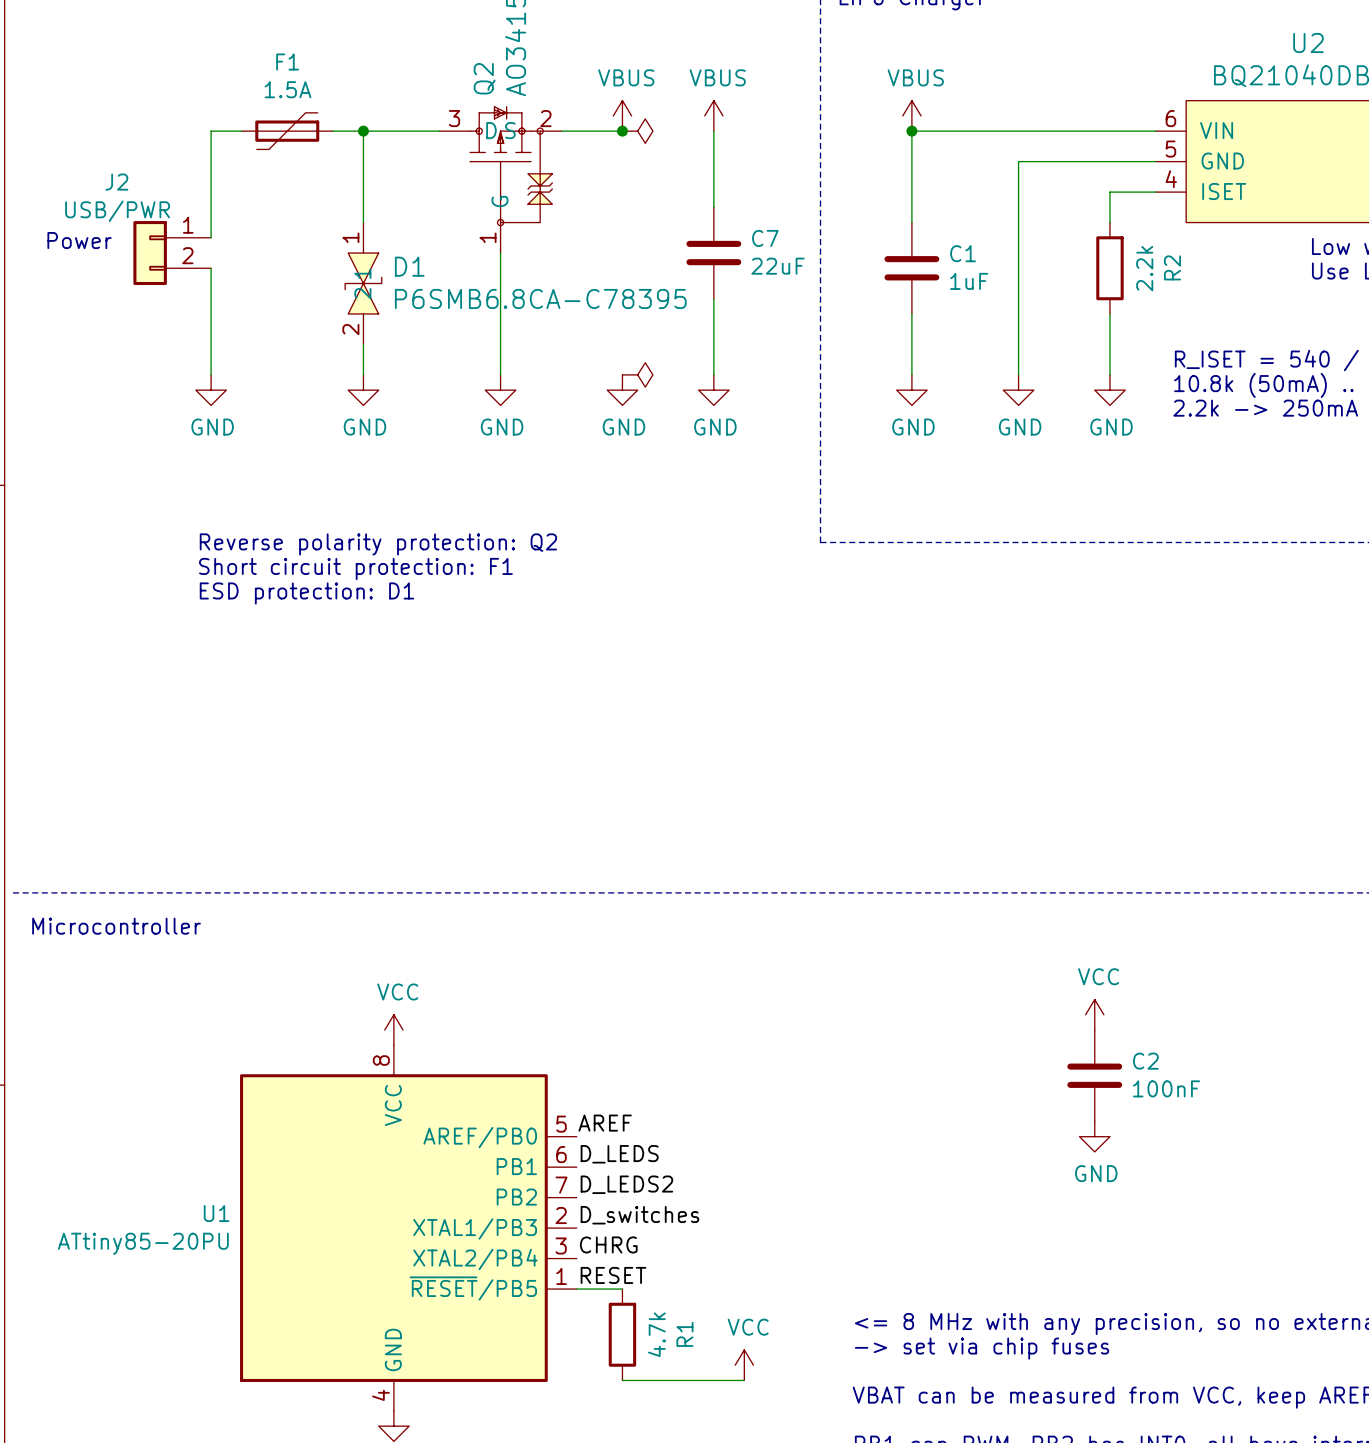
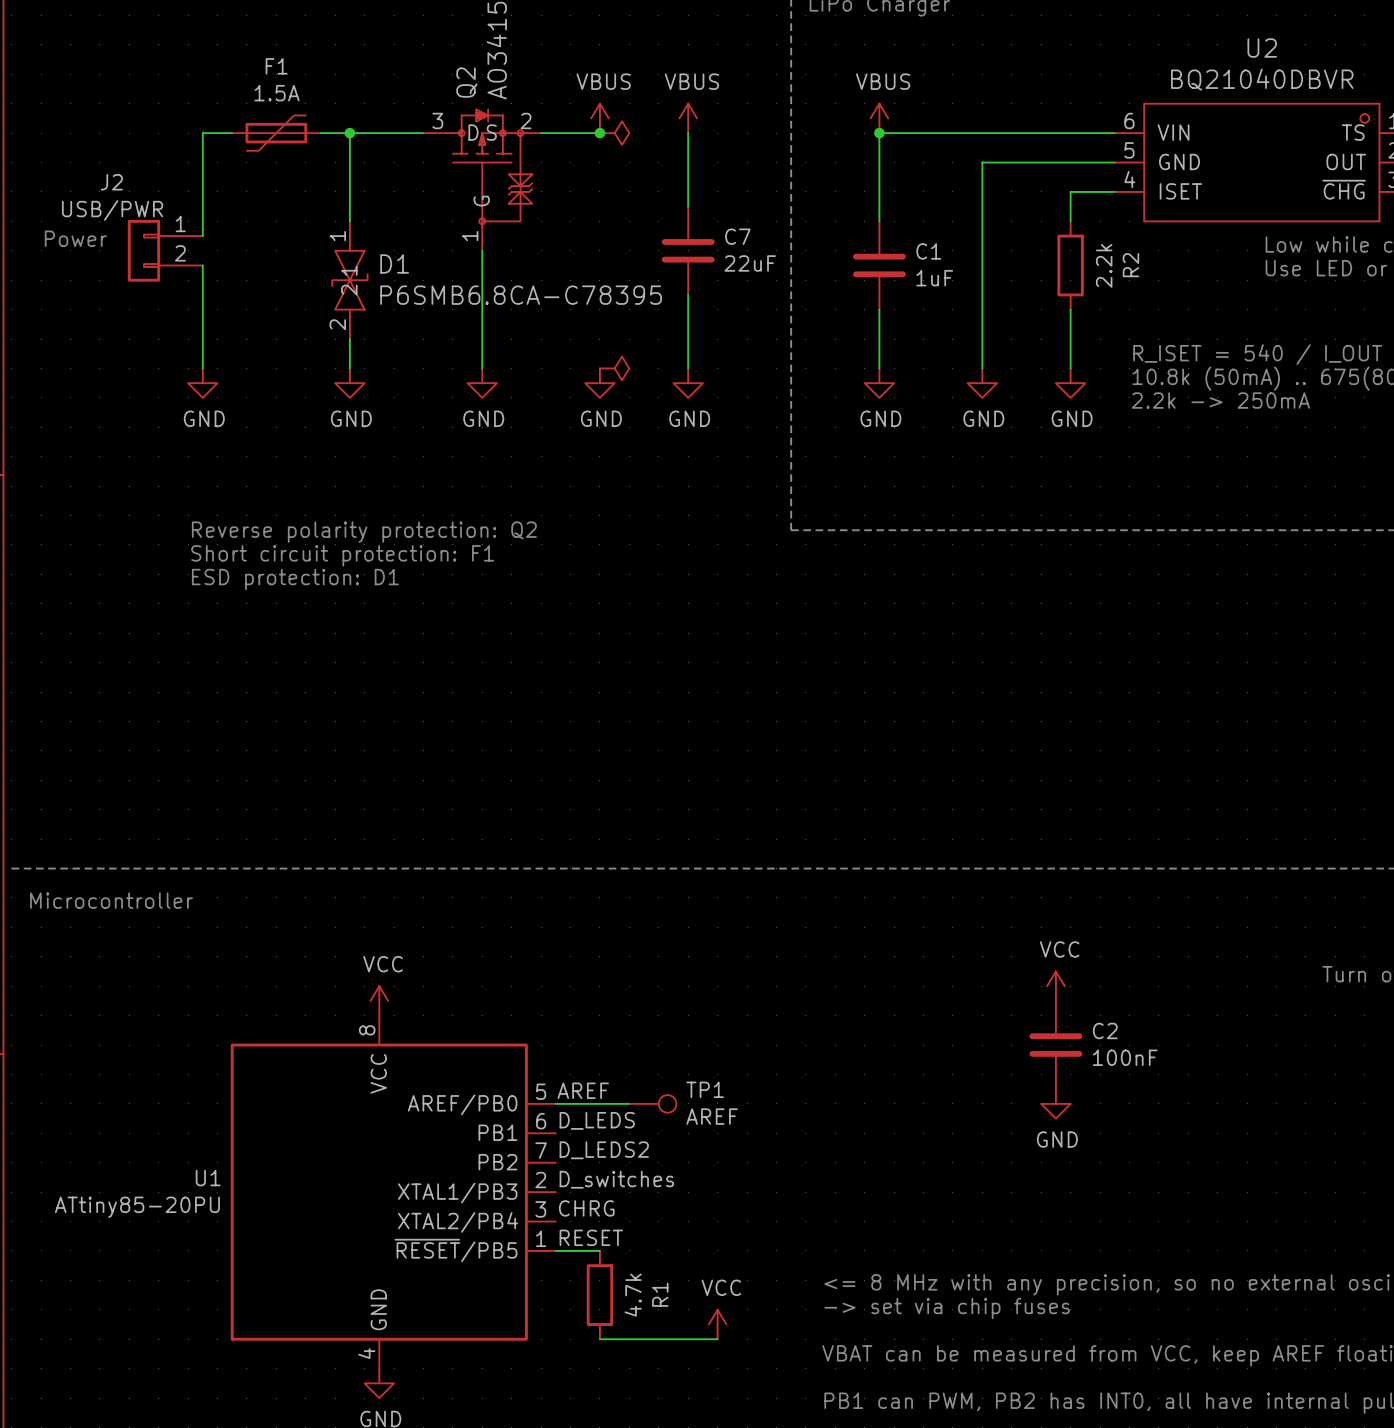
wire: none -> (555, 1103) (629, 1103)
TP1: none -> AREF (652, 1103)

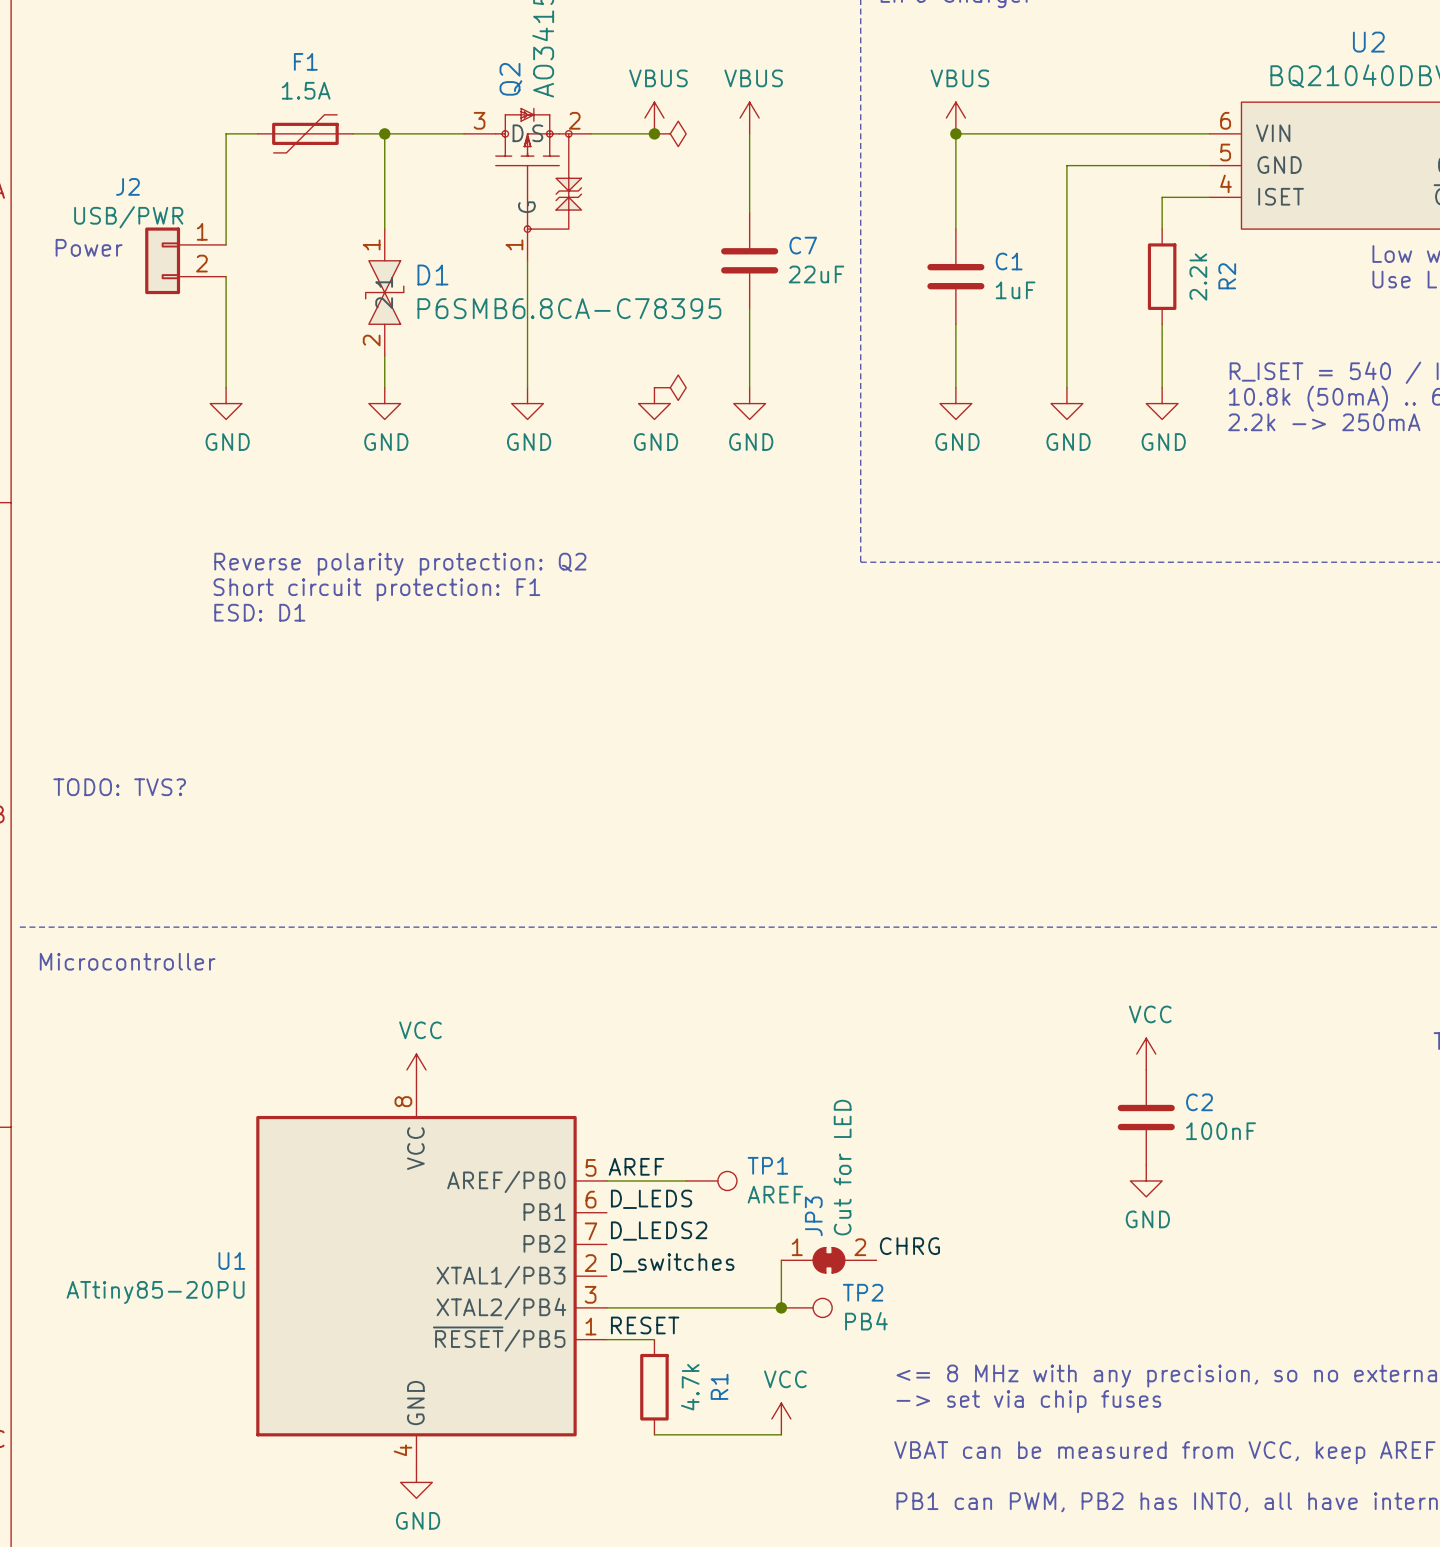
text: ESD protection: D1 (295, 579) -> ESD: D1 (259, 612)
text: none -> TODO: TVS? (119, 787)
wire: none -> (781, 1260) (781, 1307) (606, 1307)
JP3: none -> Cut for LED (828, 1260)
label position: CHRG (586, 1208) -> CHRG (909, 1246)
junction: none -> (781, 1307)
TP2: none -> PB4 (806, 1307)

